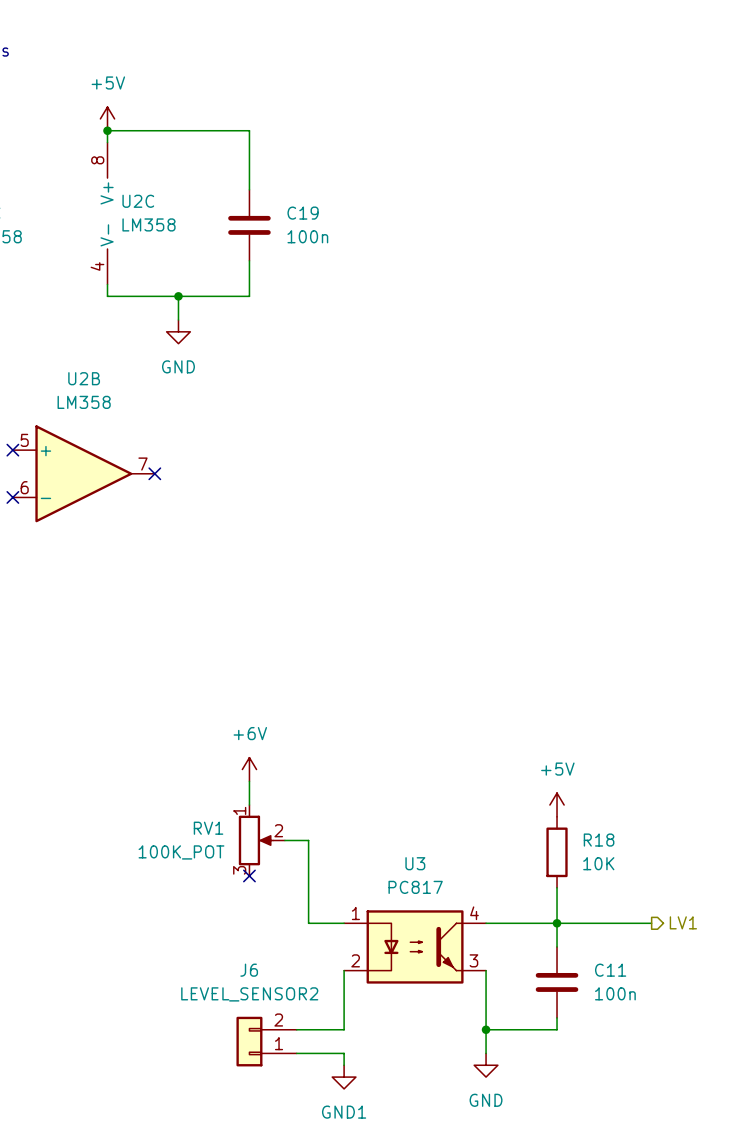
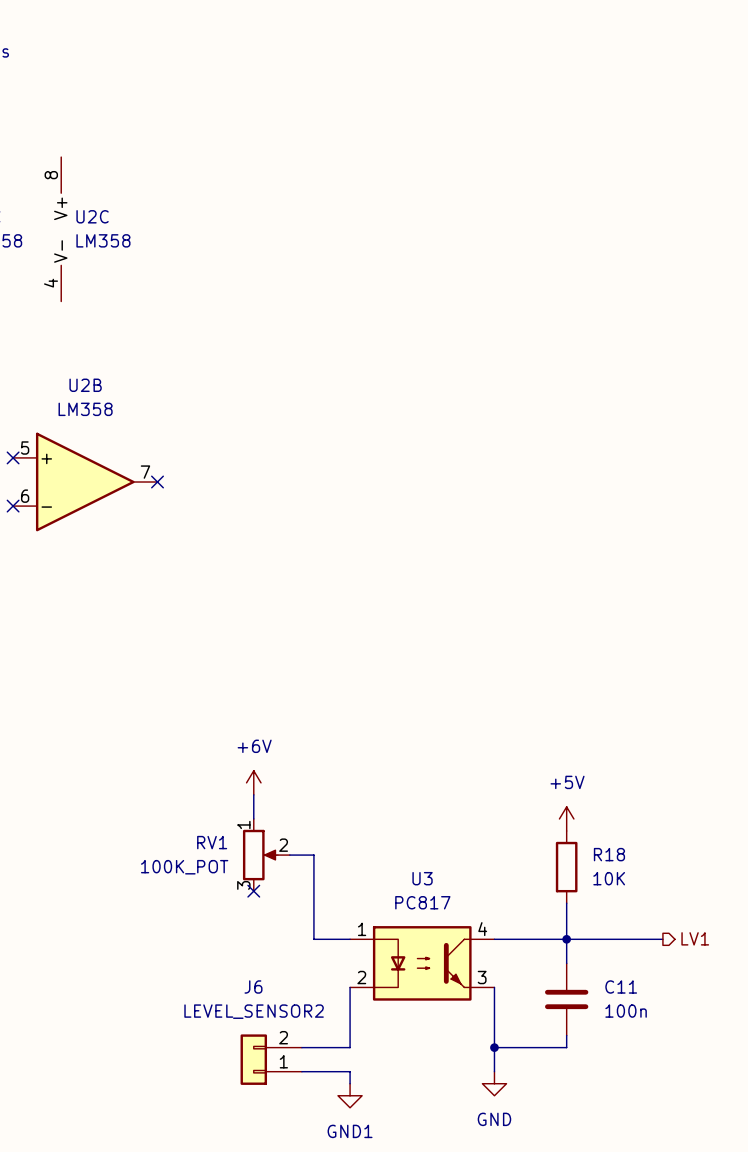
power symbol: +5V (107, 118) -> none
junction: (107, 130) -> none
wire: (107, 142) (107, 130) (249, 130) (249, 189) -> none
U2C position: (107, 213) -> (61, 229)
C19: 100n (249, 225) -> none
wire: (249, 260) (249, 296) (107, 296) (107, 284) -> none
wire: (178, 296) (178, 320) -> none
junction: (178, 296) -> none
power symbol: GND (178, 331) -> none

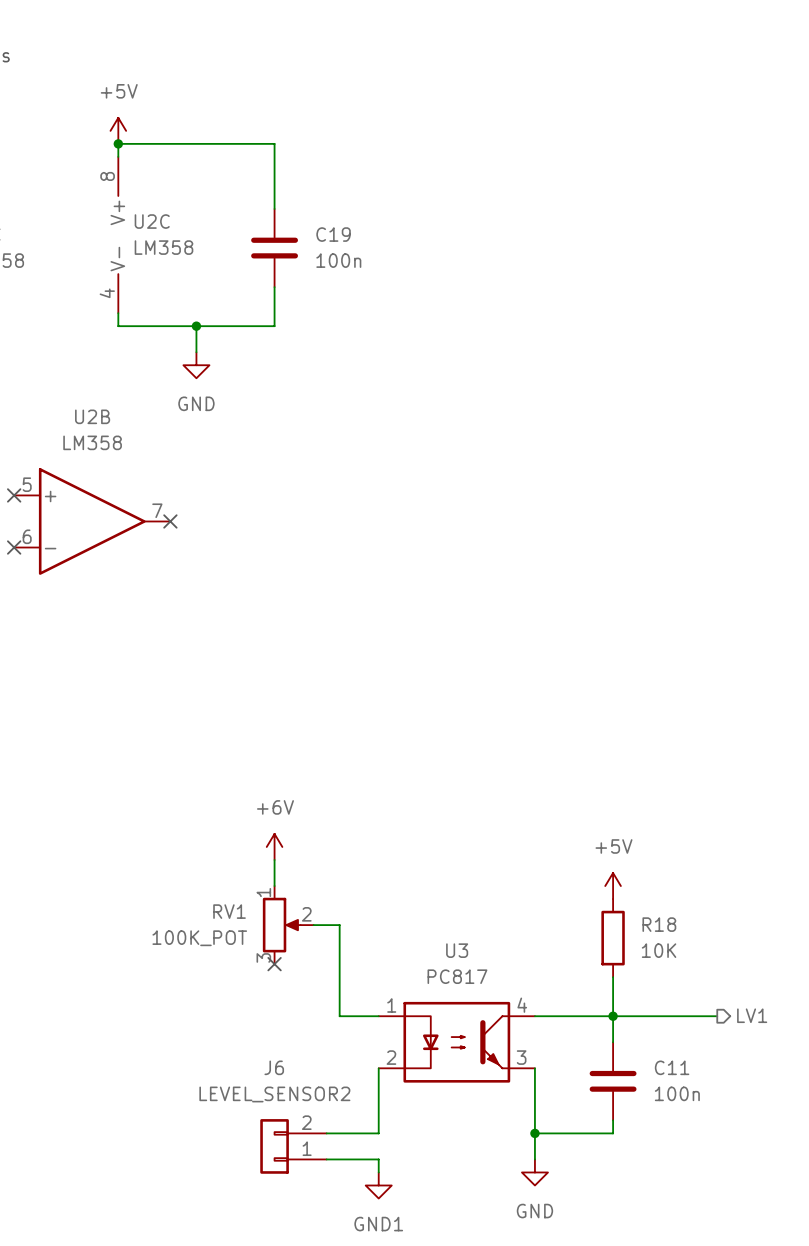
power symbol: none -> +5V (118, 130)
junction: none -> (118, 143)
wire: none -> (118, 156) (118, 143) (274, 143) (274, 209)
U2C position: (61, 229) -> (118, 235)
C19: none -> 100n (274, 248)
wire: none -> (274, 287) (274, 326) (118, 326) (118, 313)
wire: none -> (196, 326) (196, 352)
junction: none -> (196, 326)
power symbol: none -> GND (196, 365)

